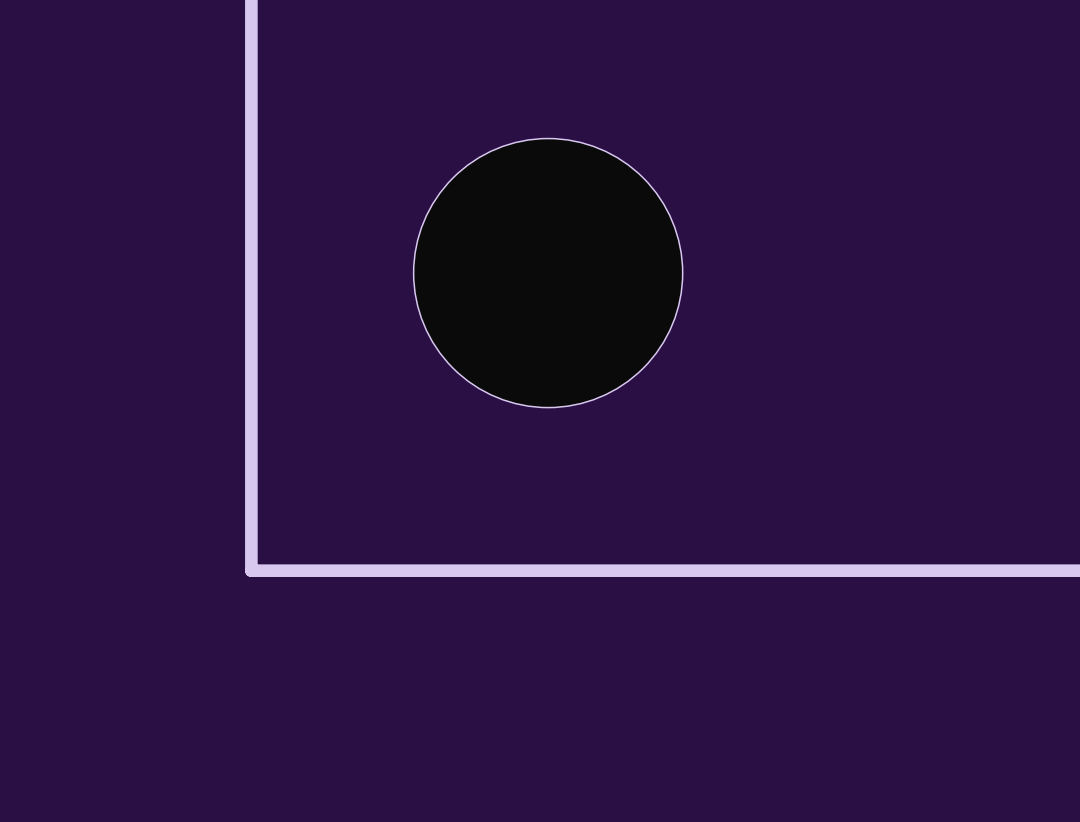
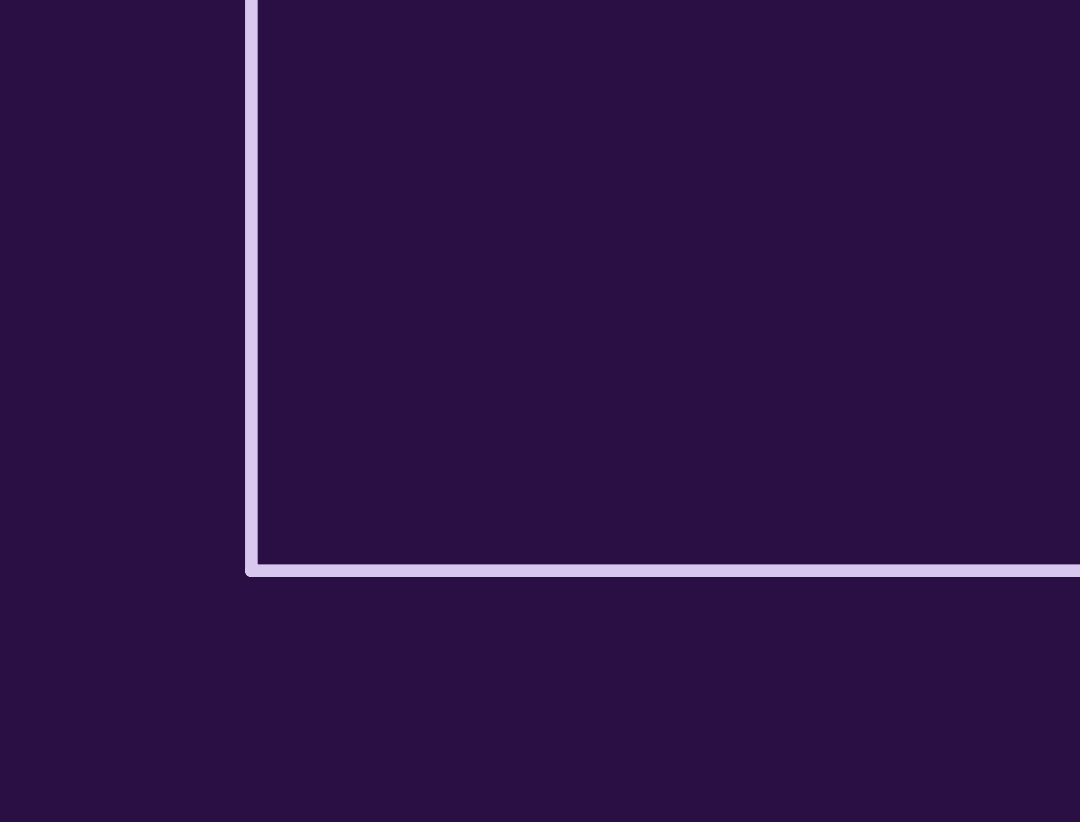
part: (548, 273) -> none

